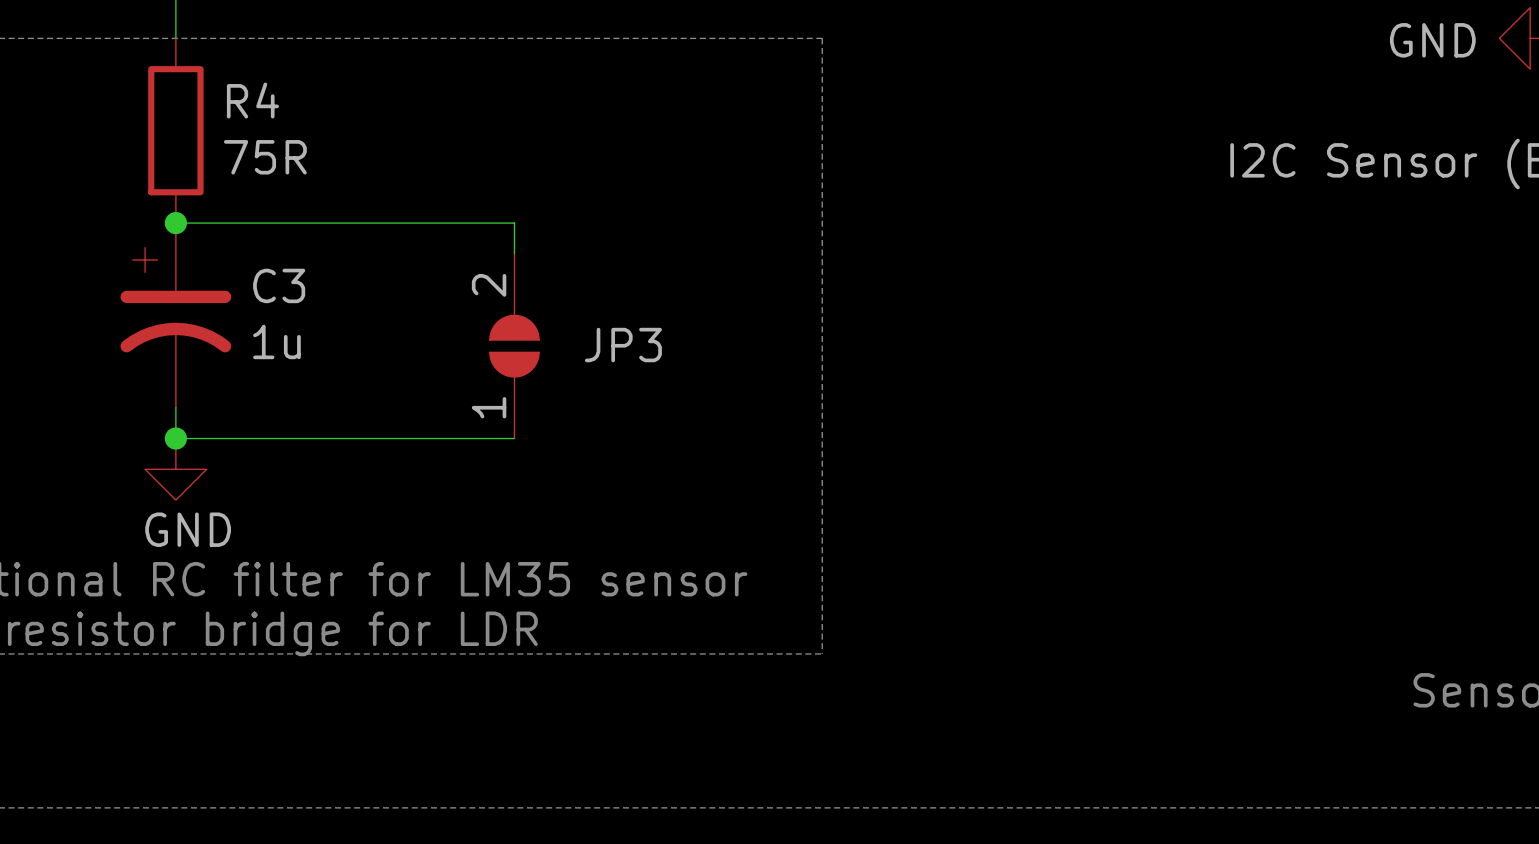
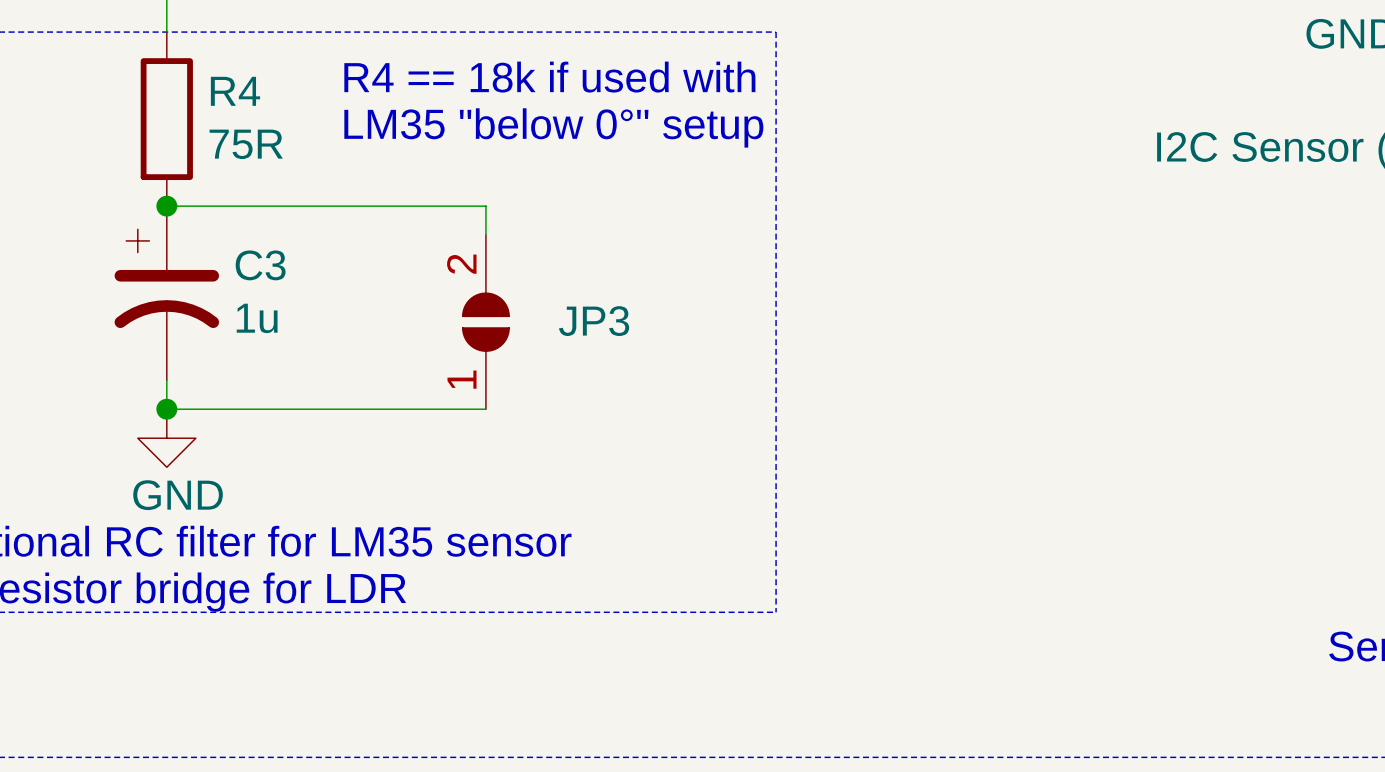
text: none -> R4 == 18k if used with (549, 77)
text: none -> LM35 "below 0°" setup (553, 127)

